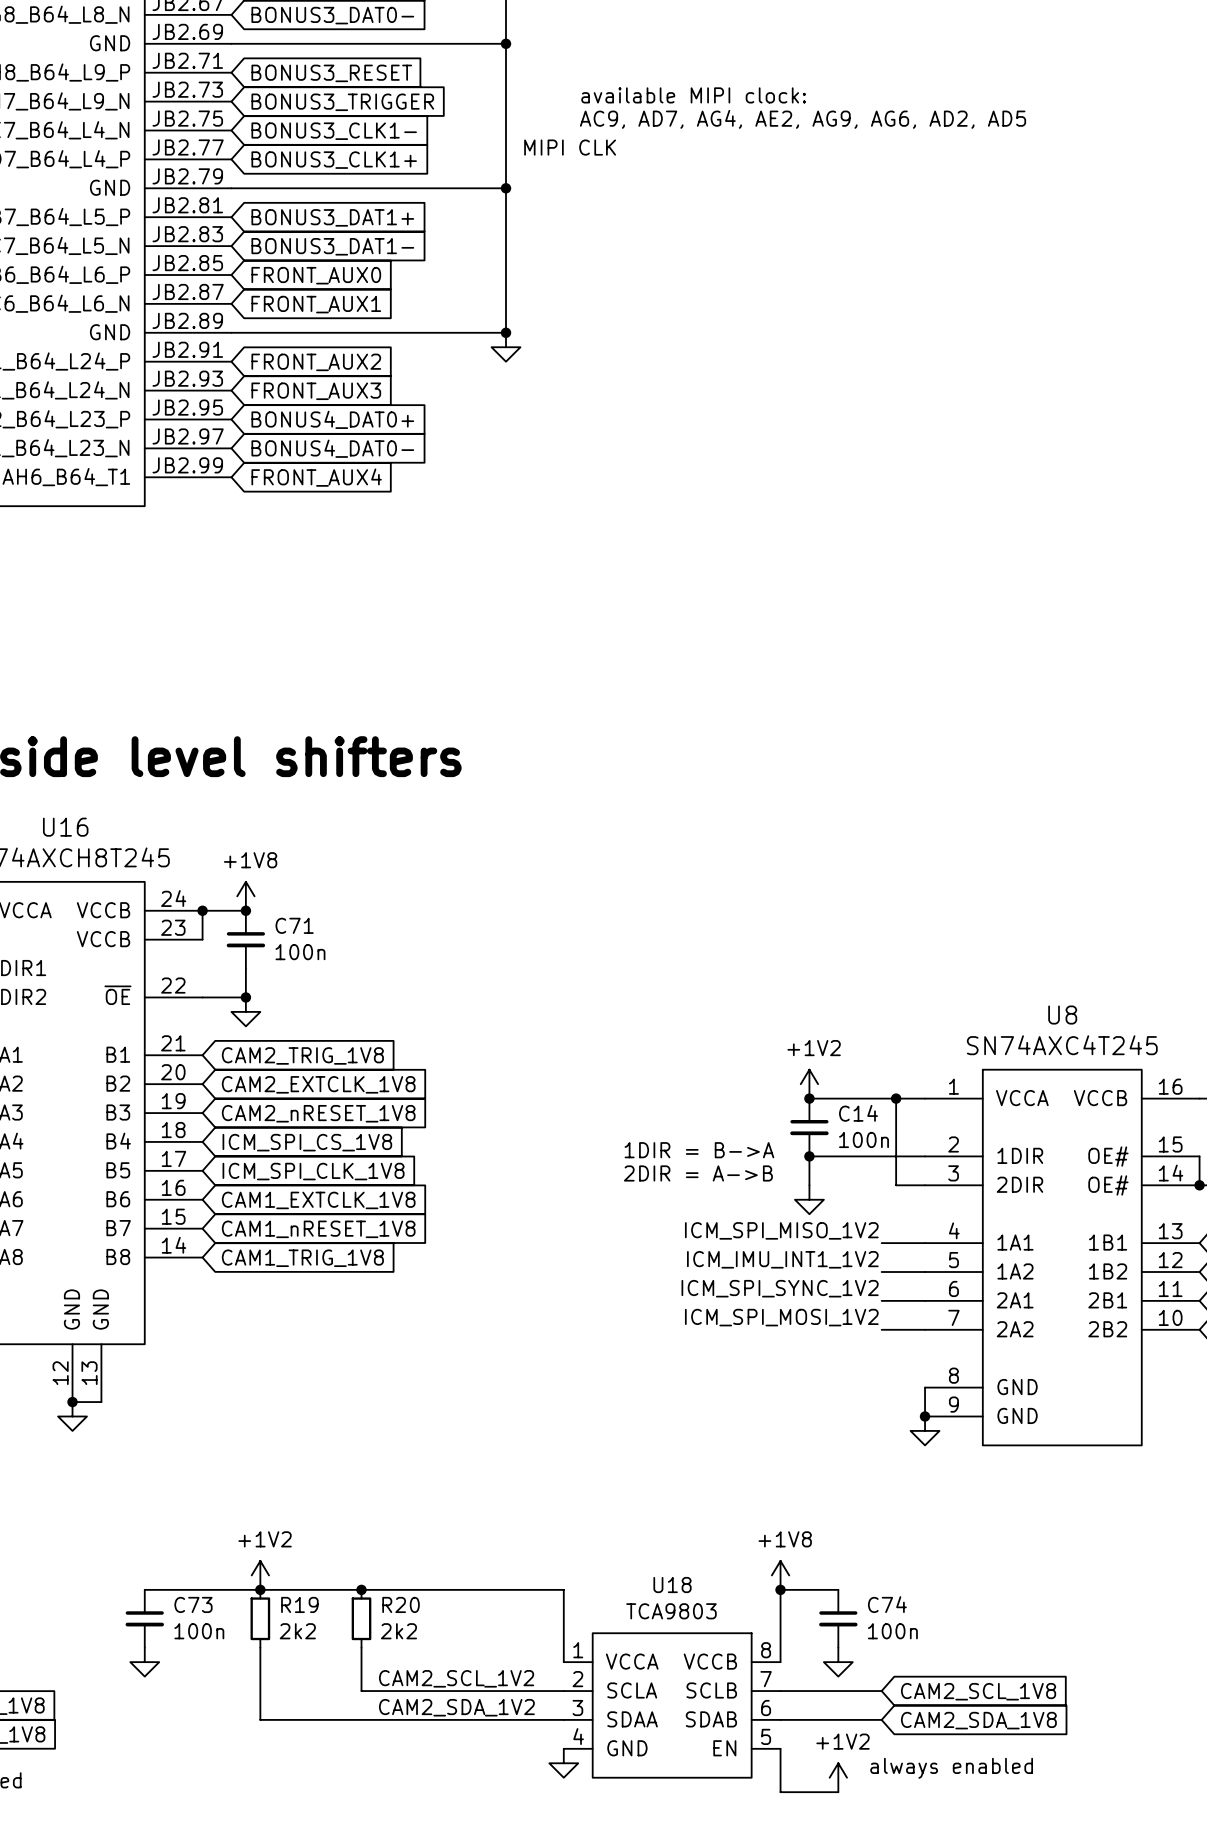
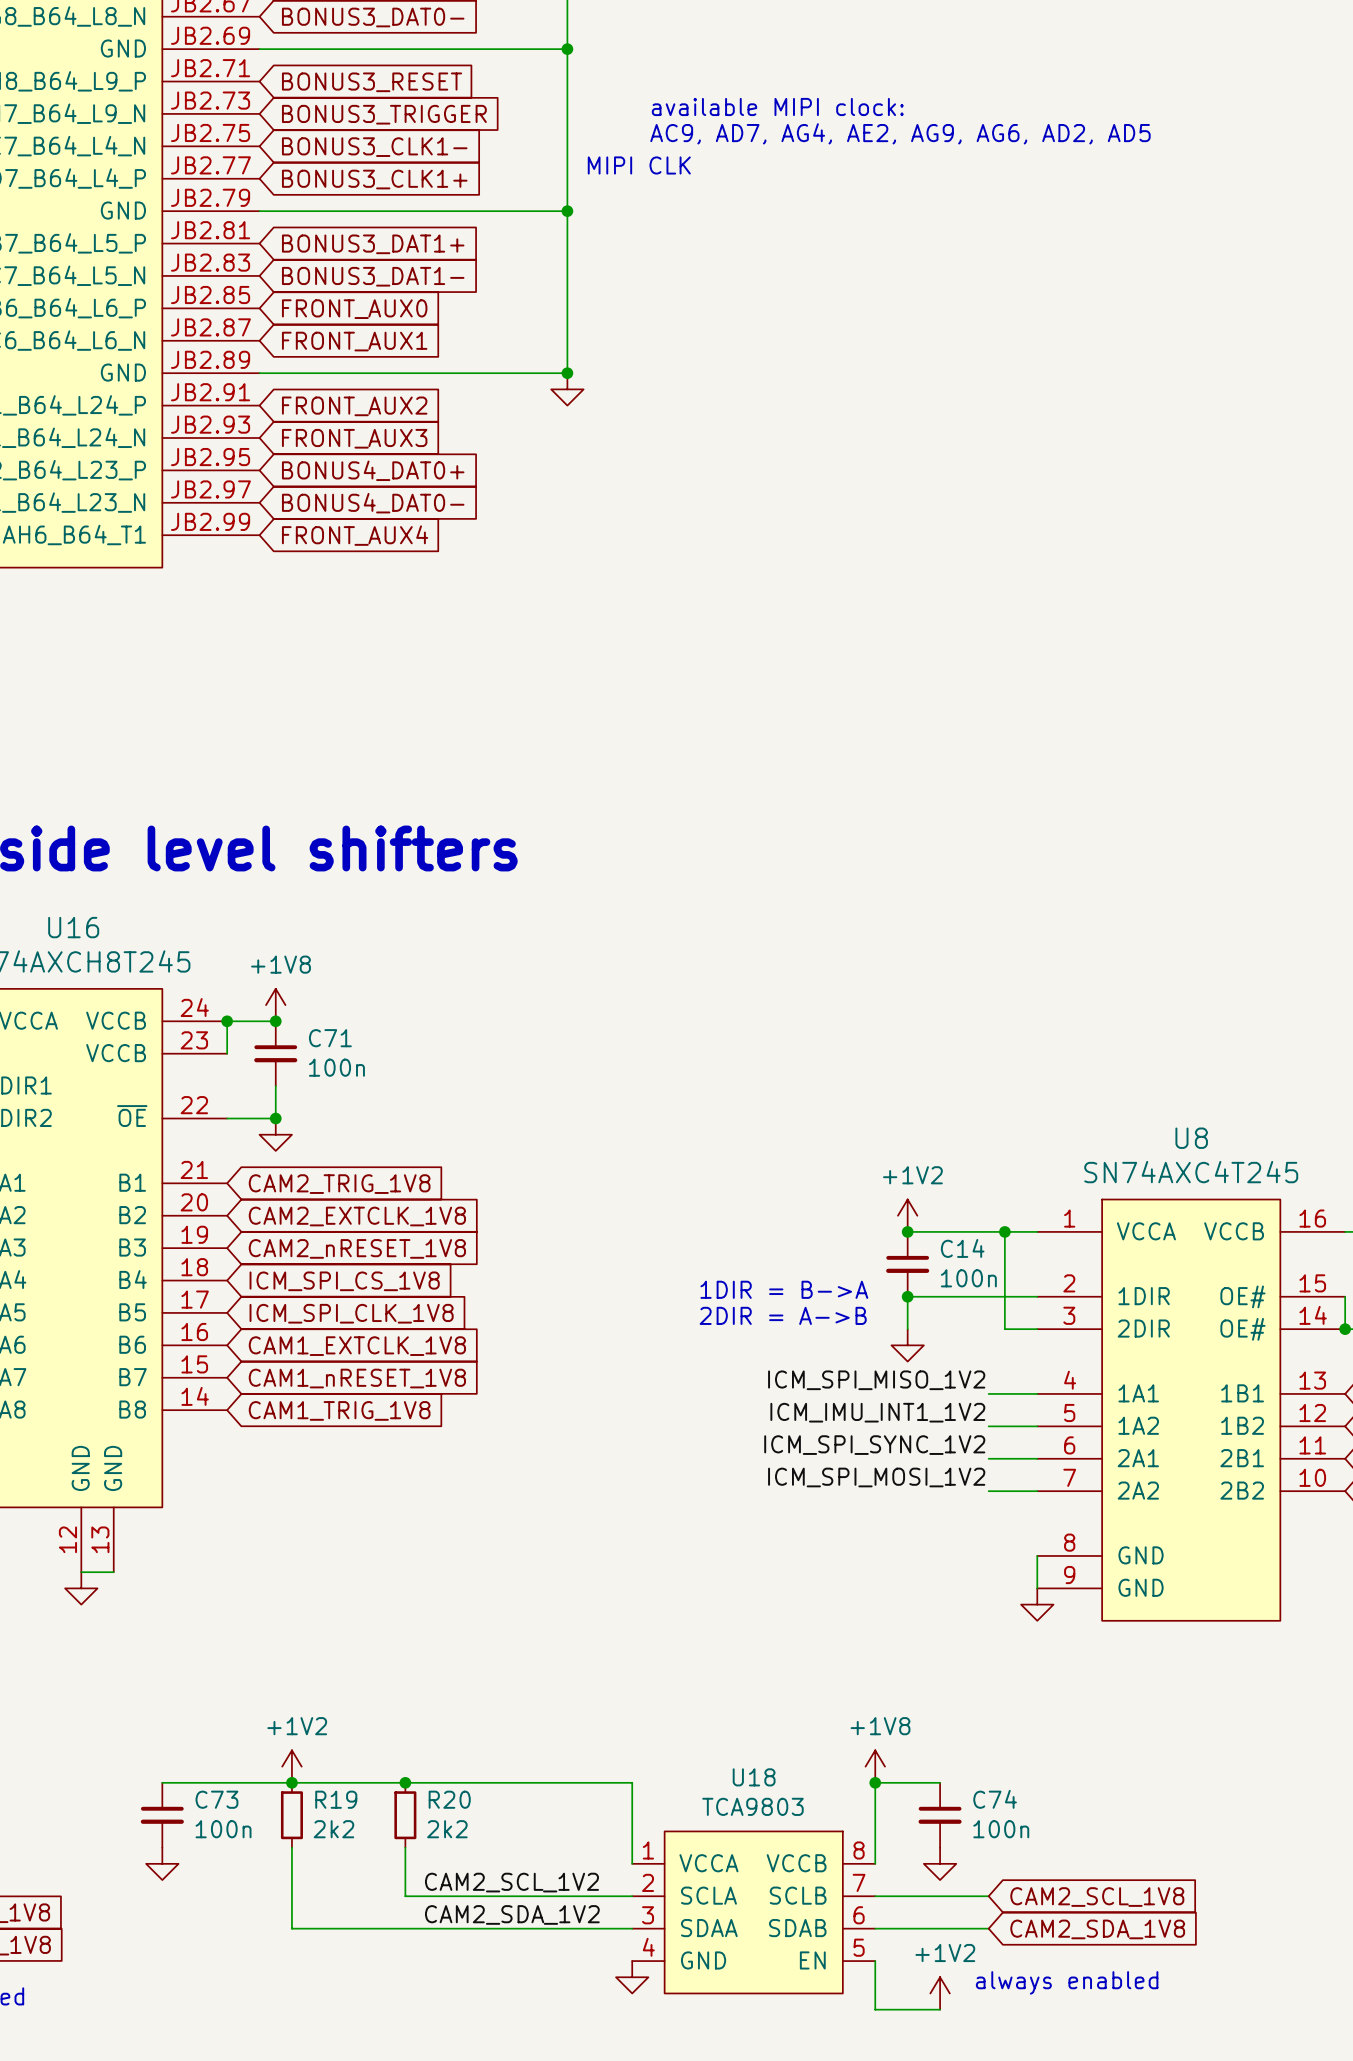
junction: (72, 1402) -> none
junction: (925, 1416) -> none

